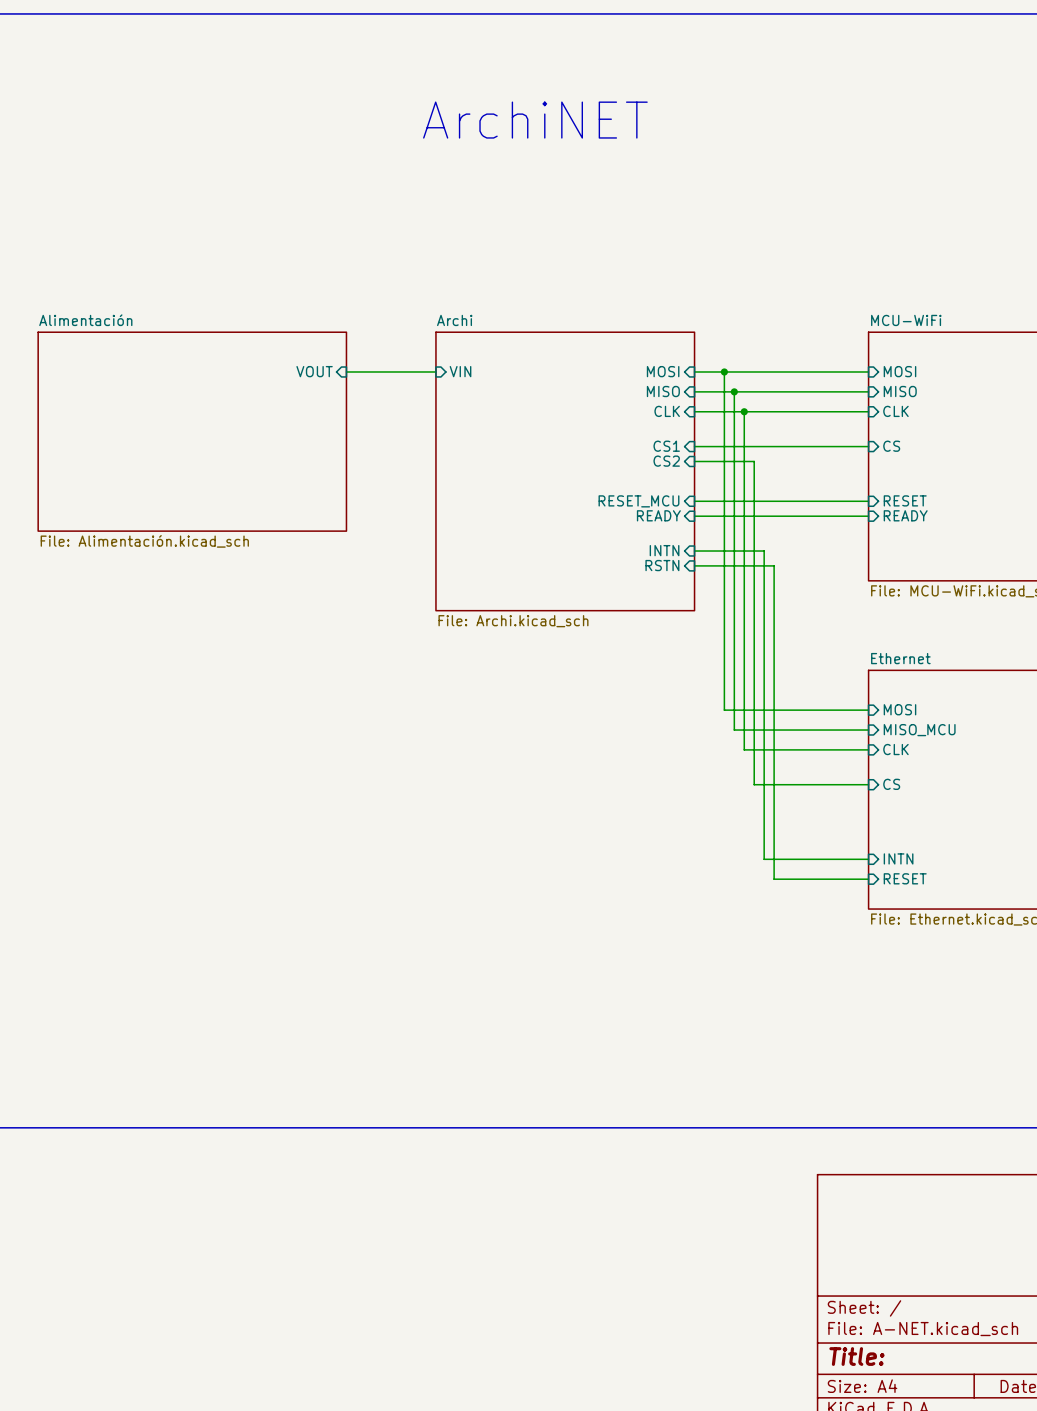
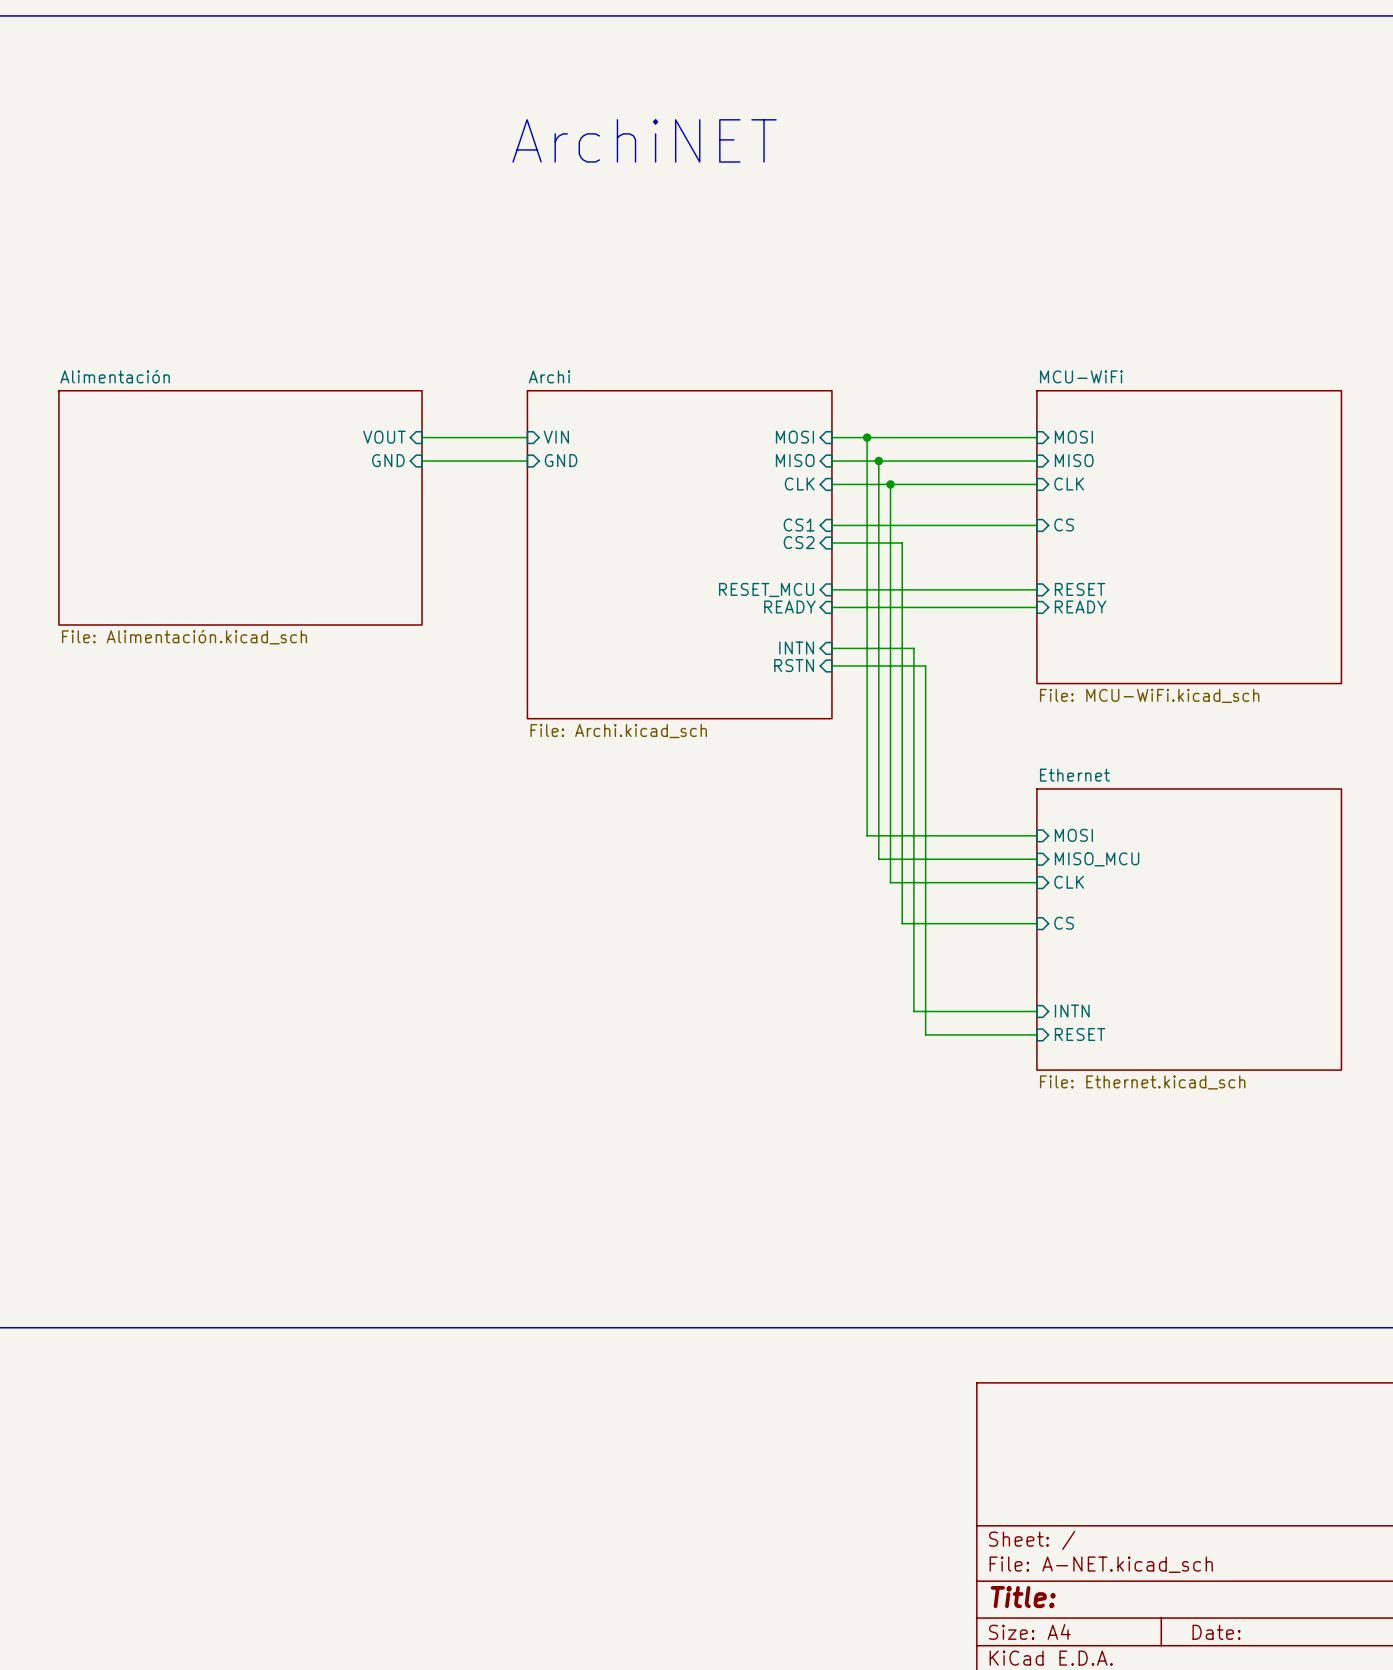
sheet pin: none -> GND (388, 460)
wire: none -> (422, 461) (527, 461)
sheet pin: none -> GND (561, 460)

